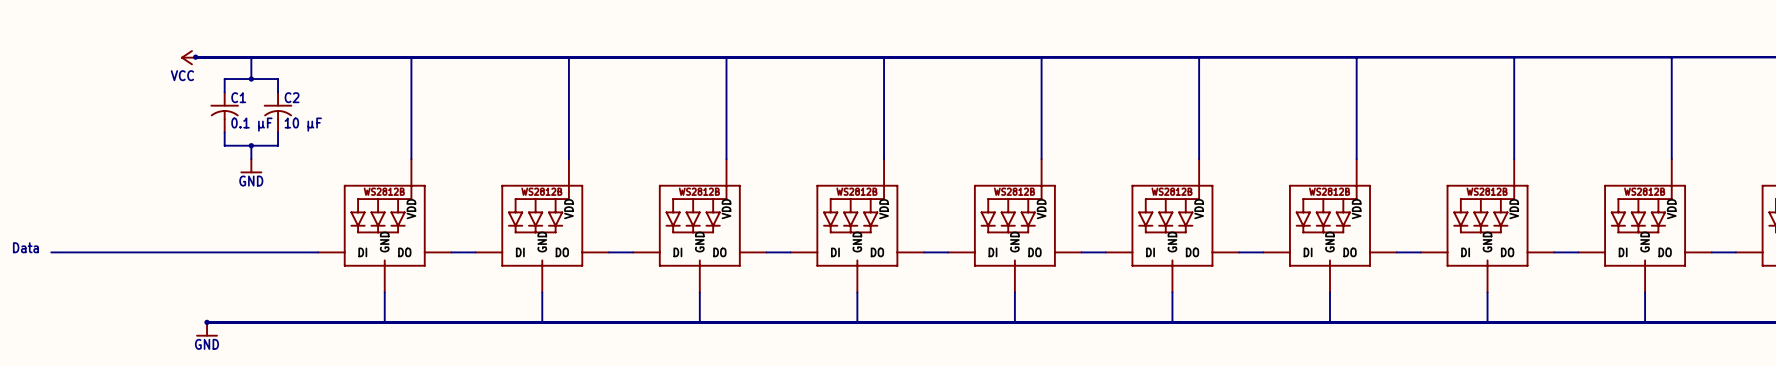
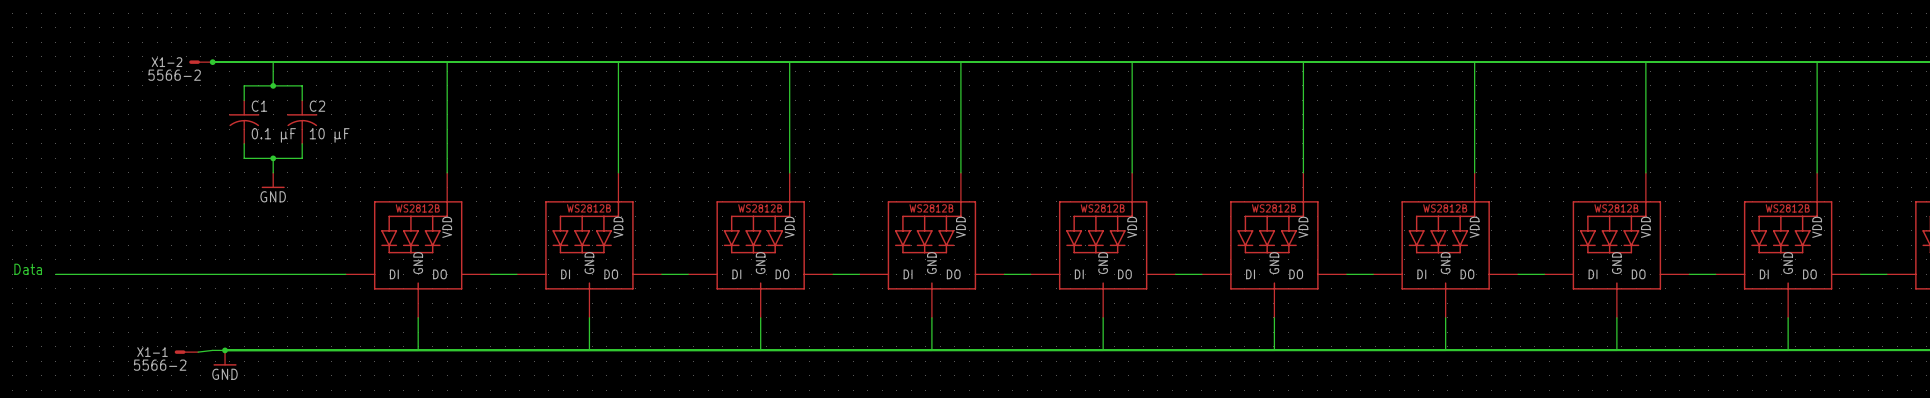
X1-2: none -> 5566-2 (200, 62)
power symbol: VCC (188, 57) -> none
wire: none -> (225, 350) (198, 352)
X1-1: none -> 5566-2 (186, 352)

